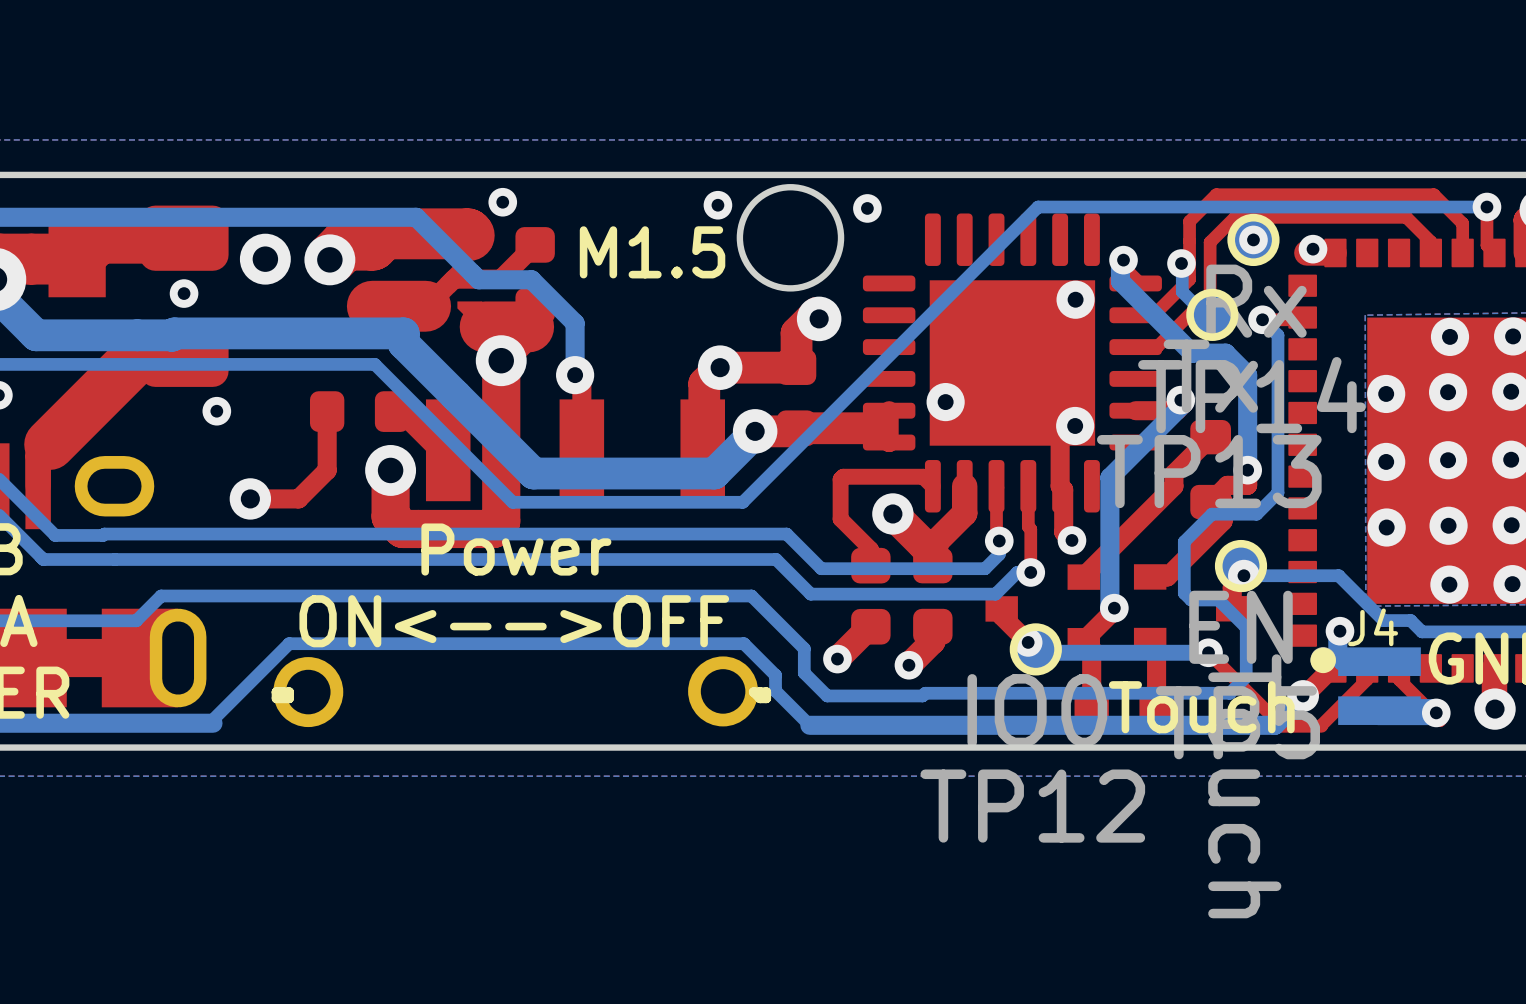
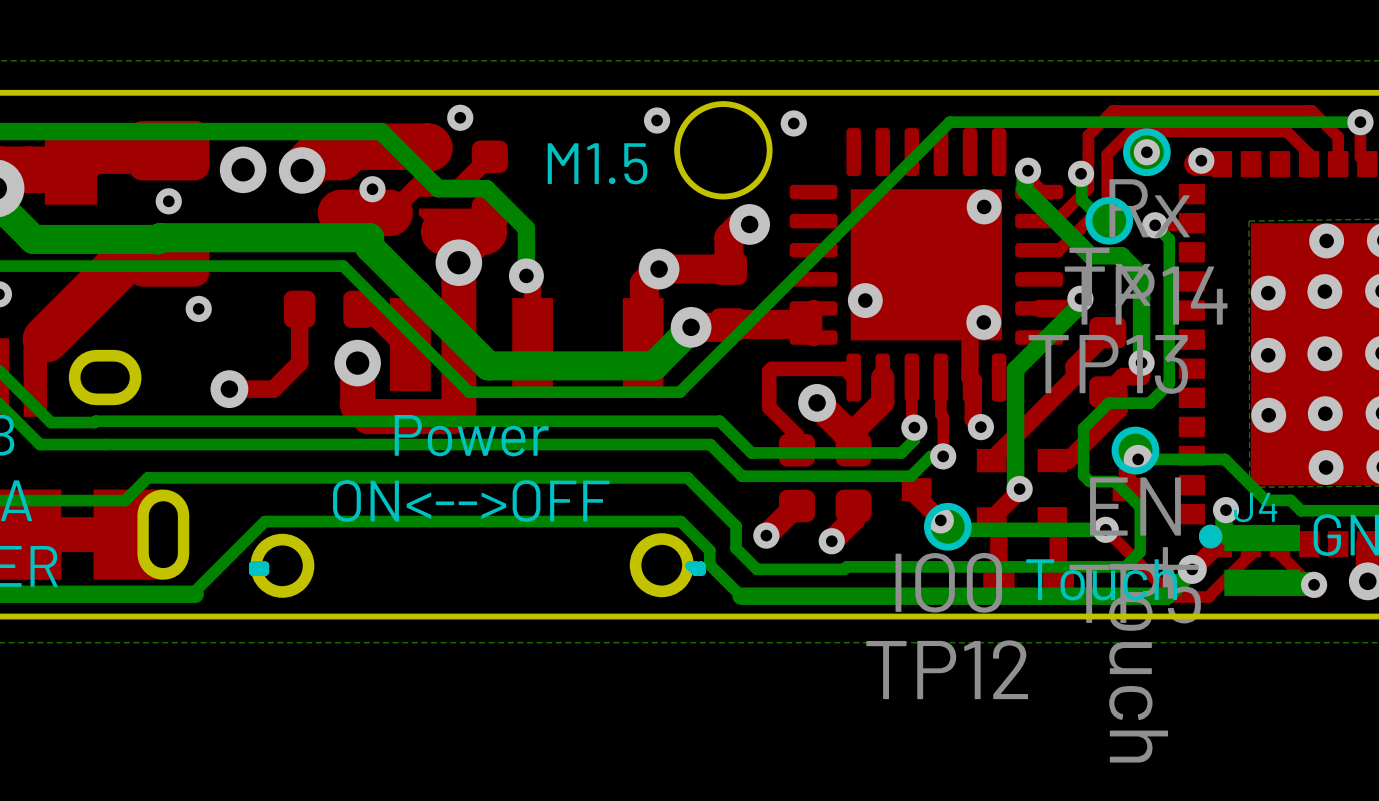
via: none -> (372, 189)

